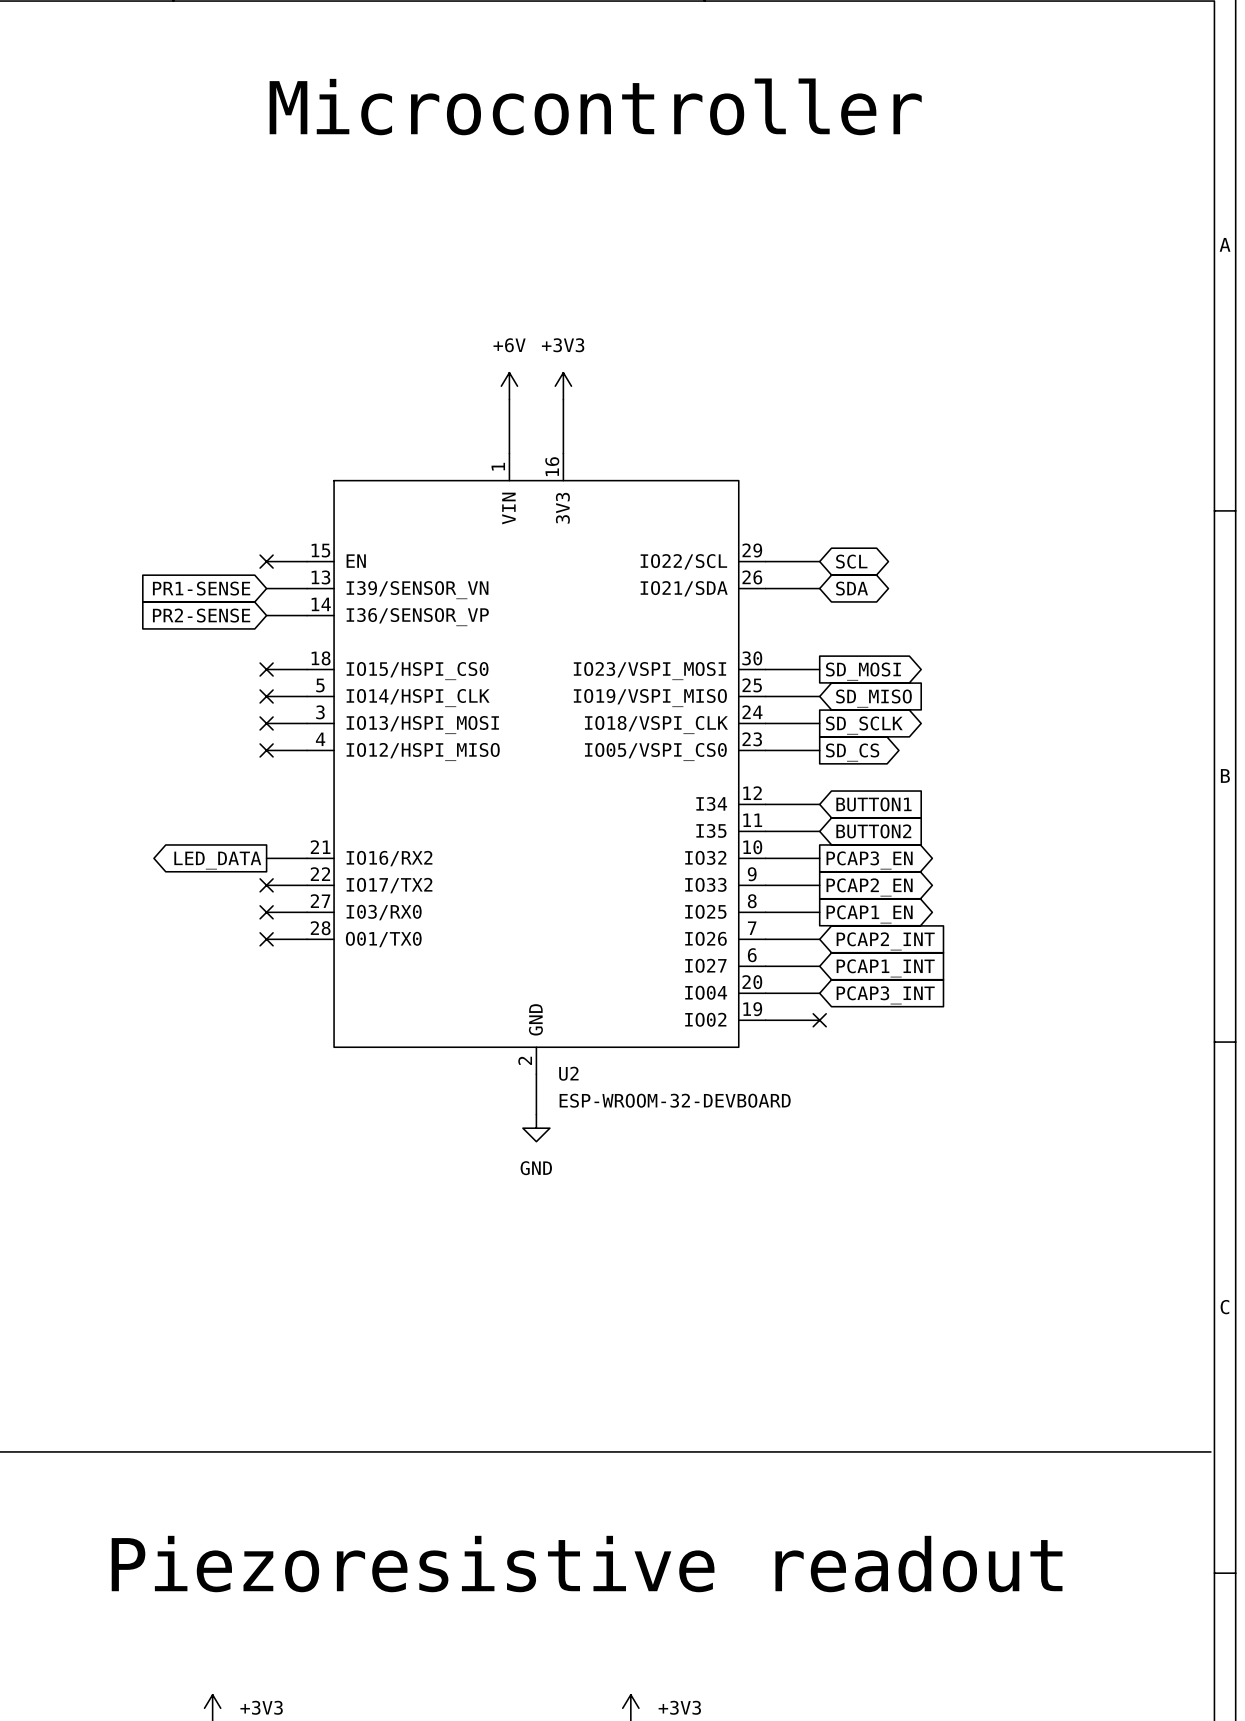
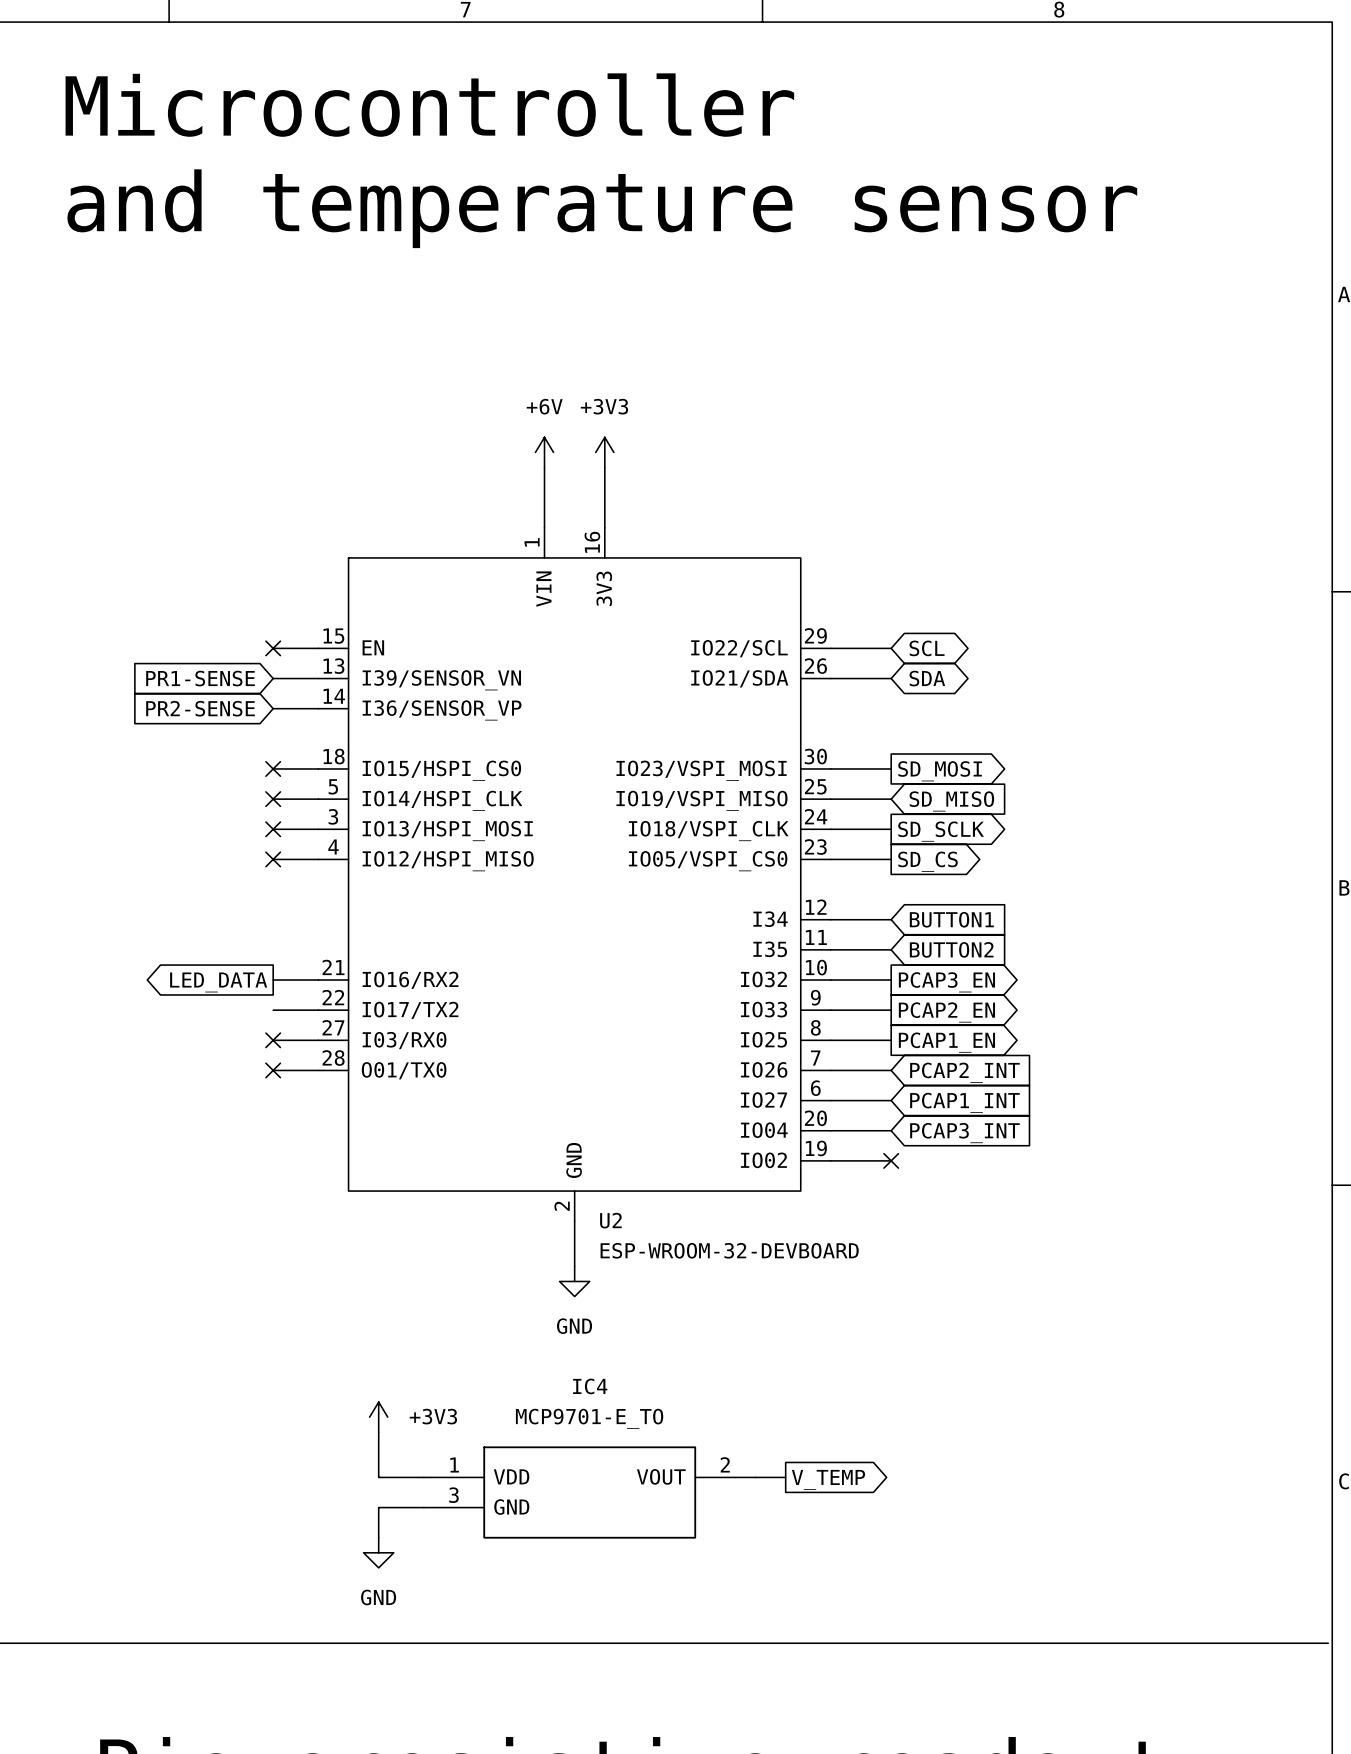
text position: Microcontroller (595, 106) -> Microcontroller (429, 105)
text: none -> and temperature sensor (602, 208)
no-connect mark: (266, 885) -> none
power symbol: none -> +3V3 (378, 1417)
wire: none -> (378, 1432) (378, 1477) (423, 1477)
wire: none -> (755, 1477) (785, 1477)
global label: none -> V_TEMP (828, 1479)
IC4: none -> MCP9701-E_TO (589, 1492)
wire: none -> (423, 1507) (378, 1507) (378, 1537)
power symbol: none -> GND (378, 1552)

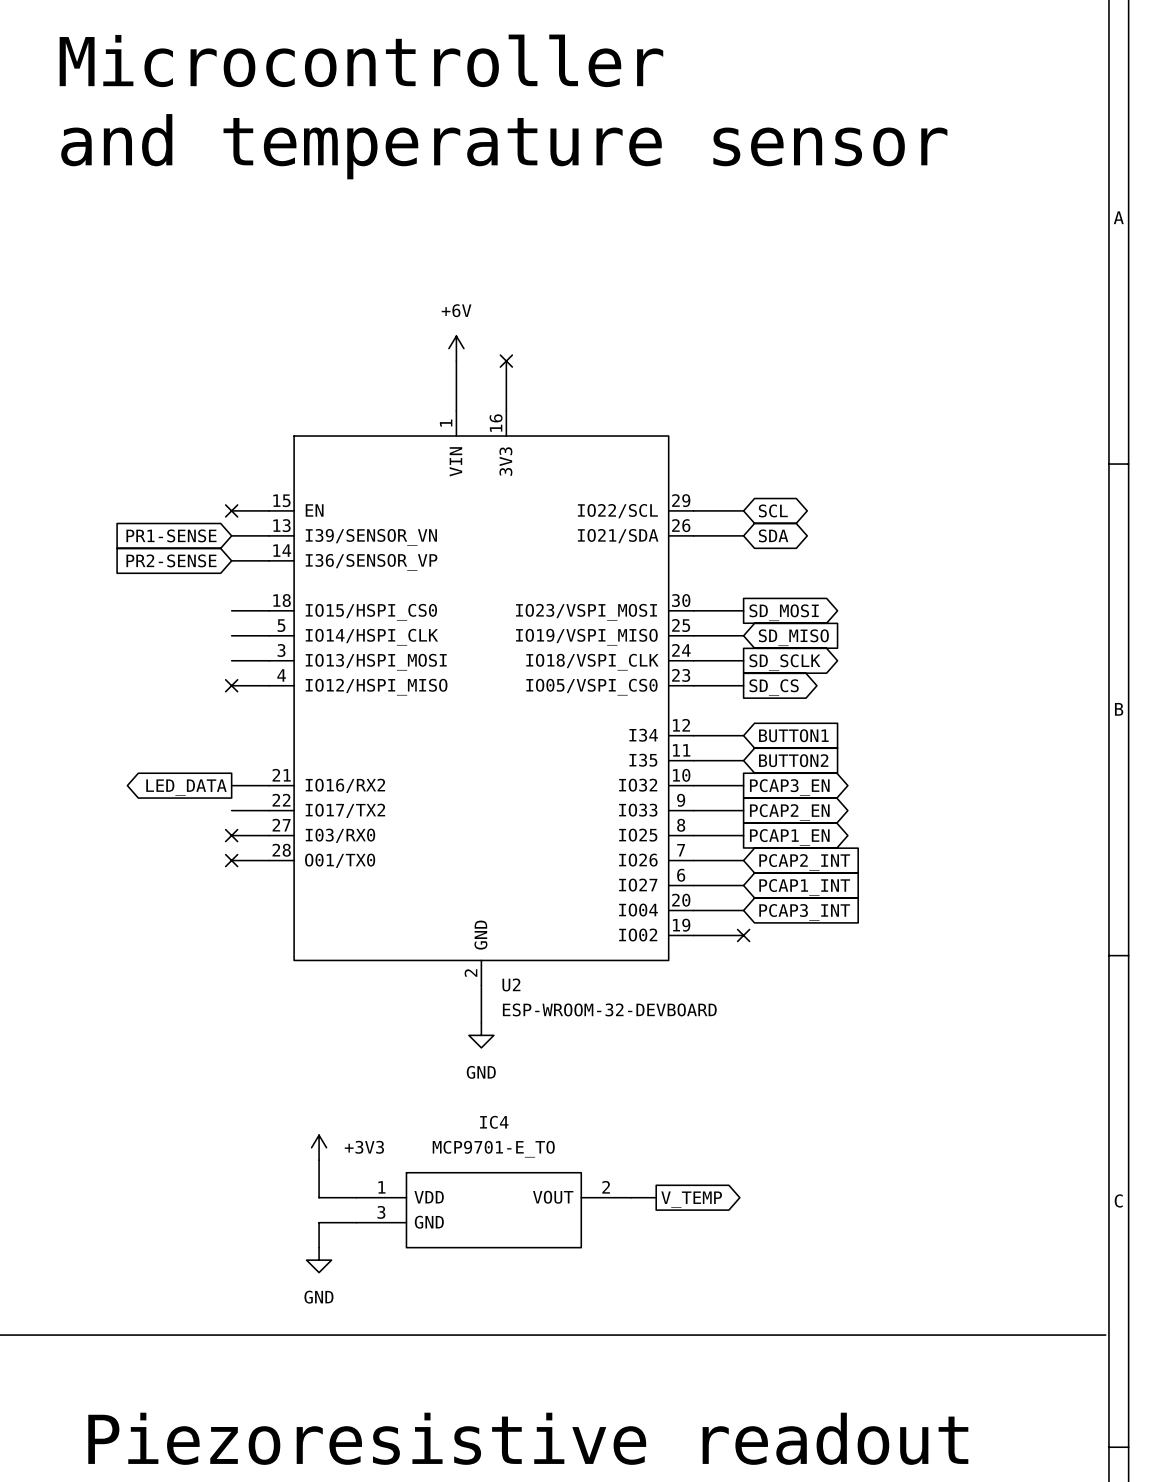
power symbol: +3V3 (604, 452) -> none
no-connect mark: none -> (506, 361)
no-connect mark: (273, 768) -> none
no-connect mark: (273, 799) -> none
no-connect mark: (273, 829) -> none

